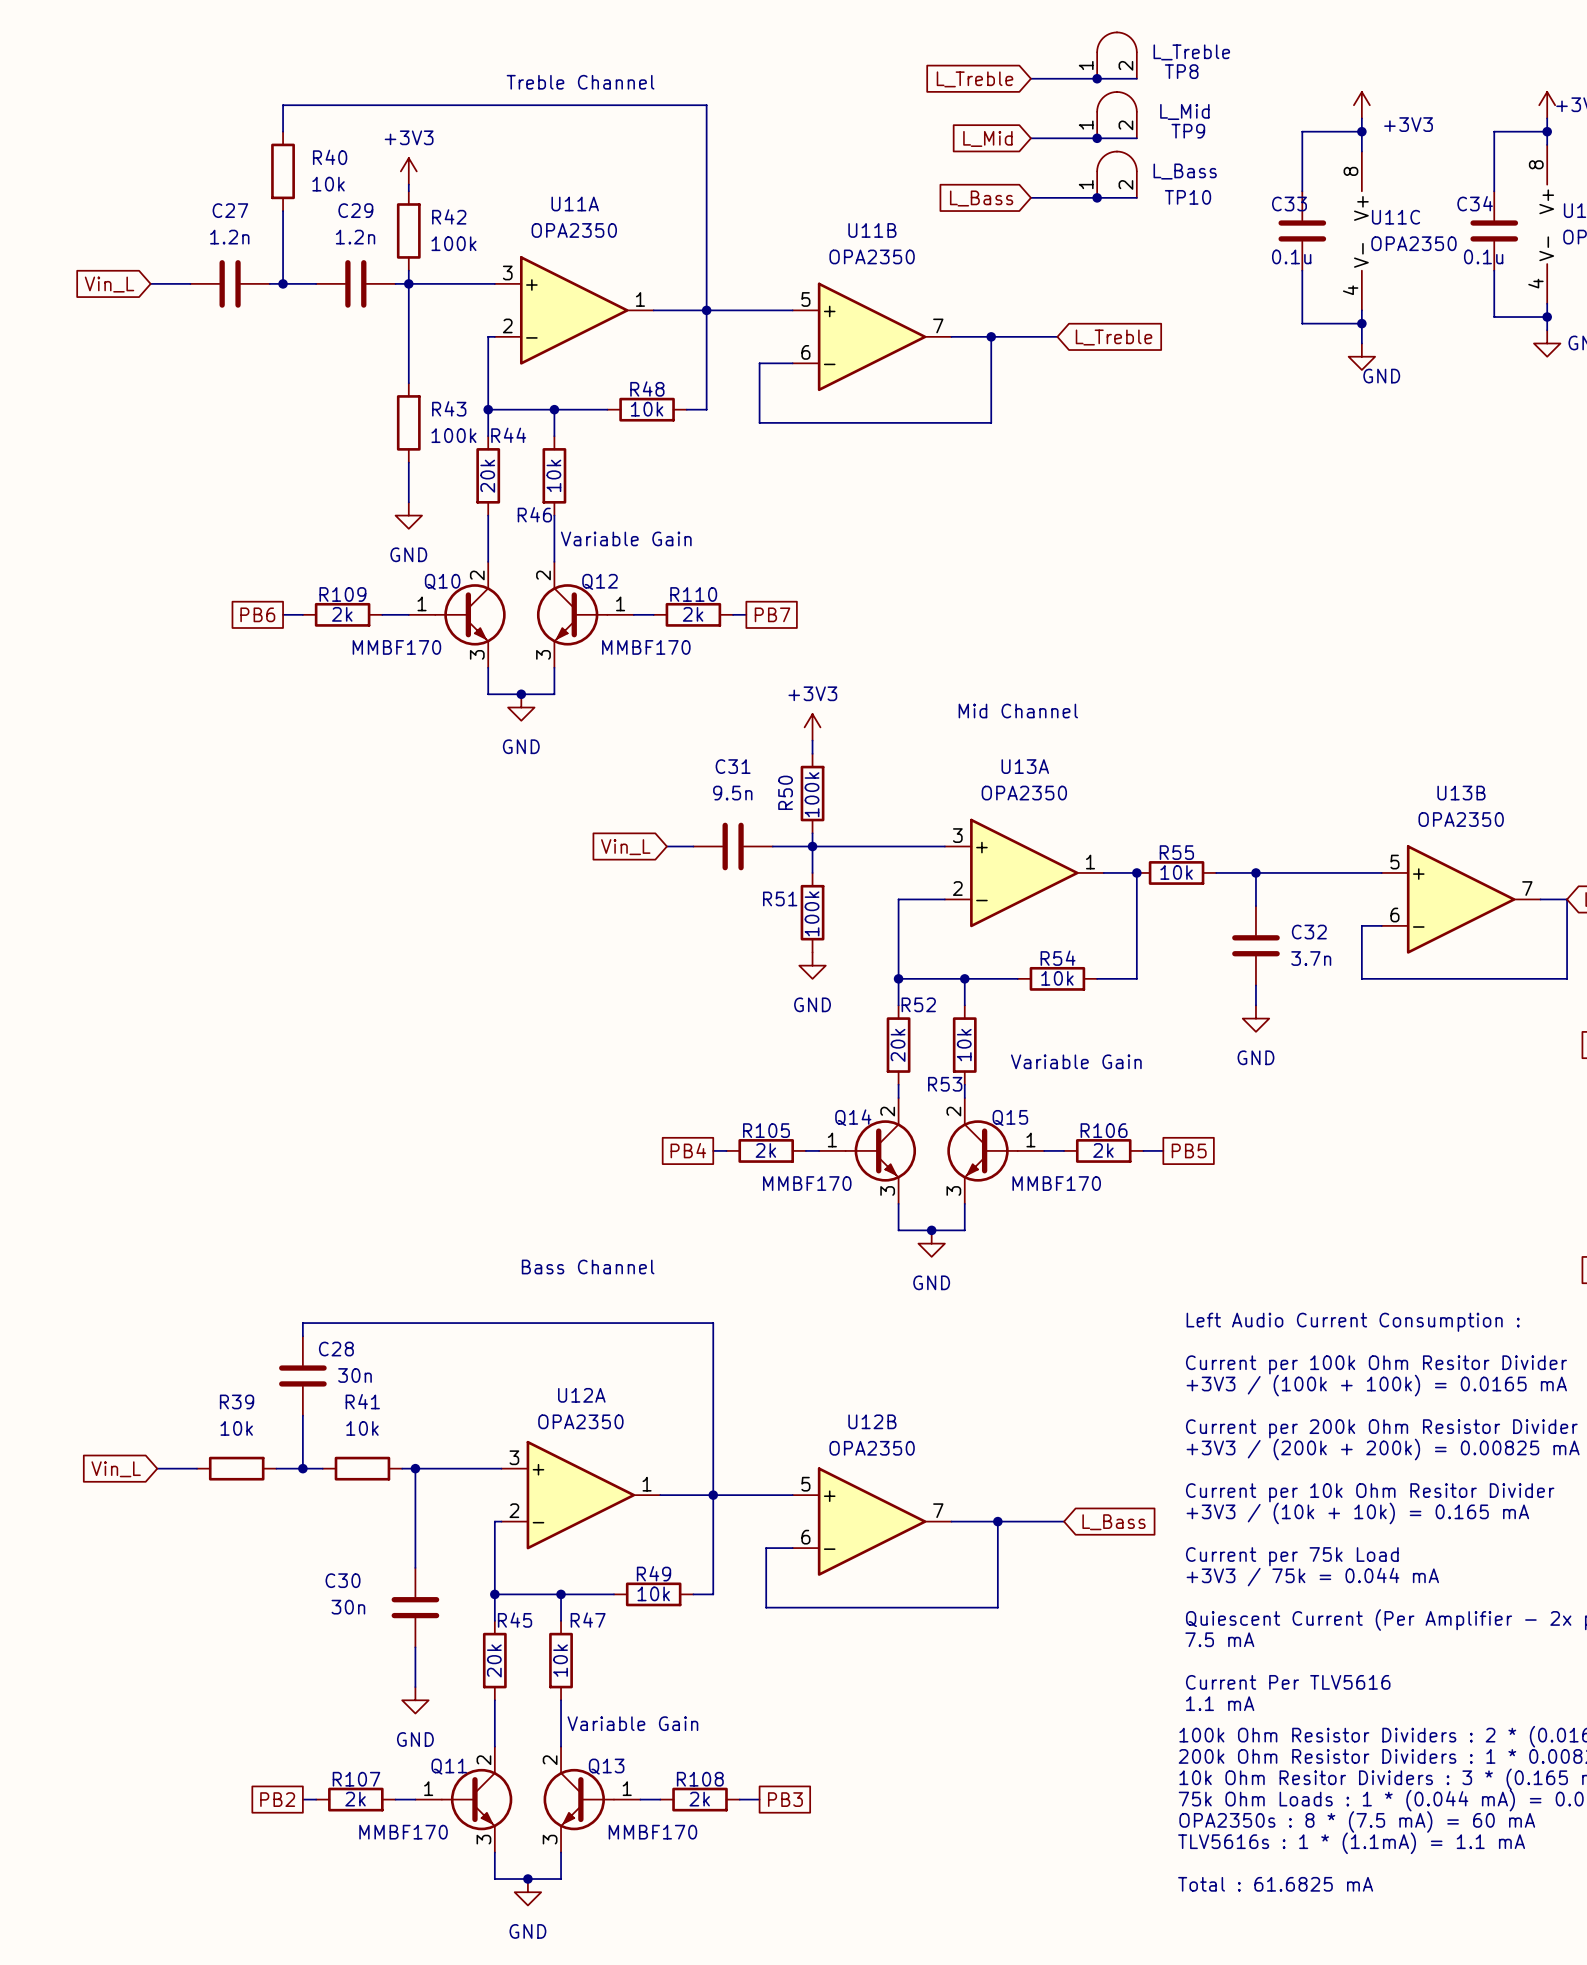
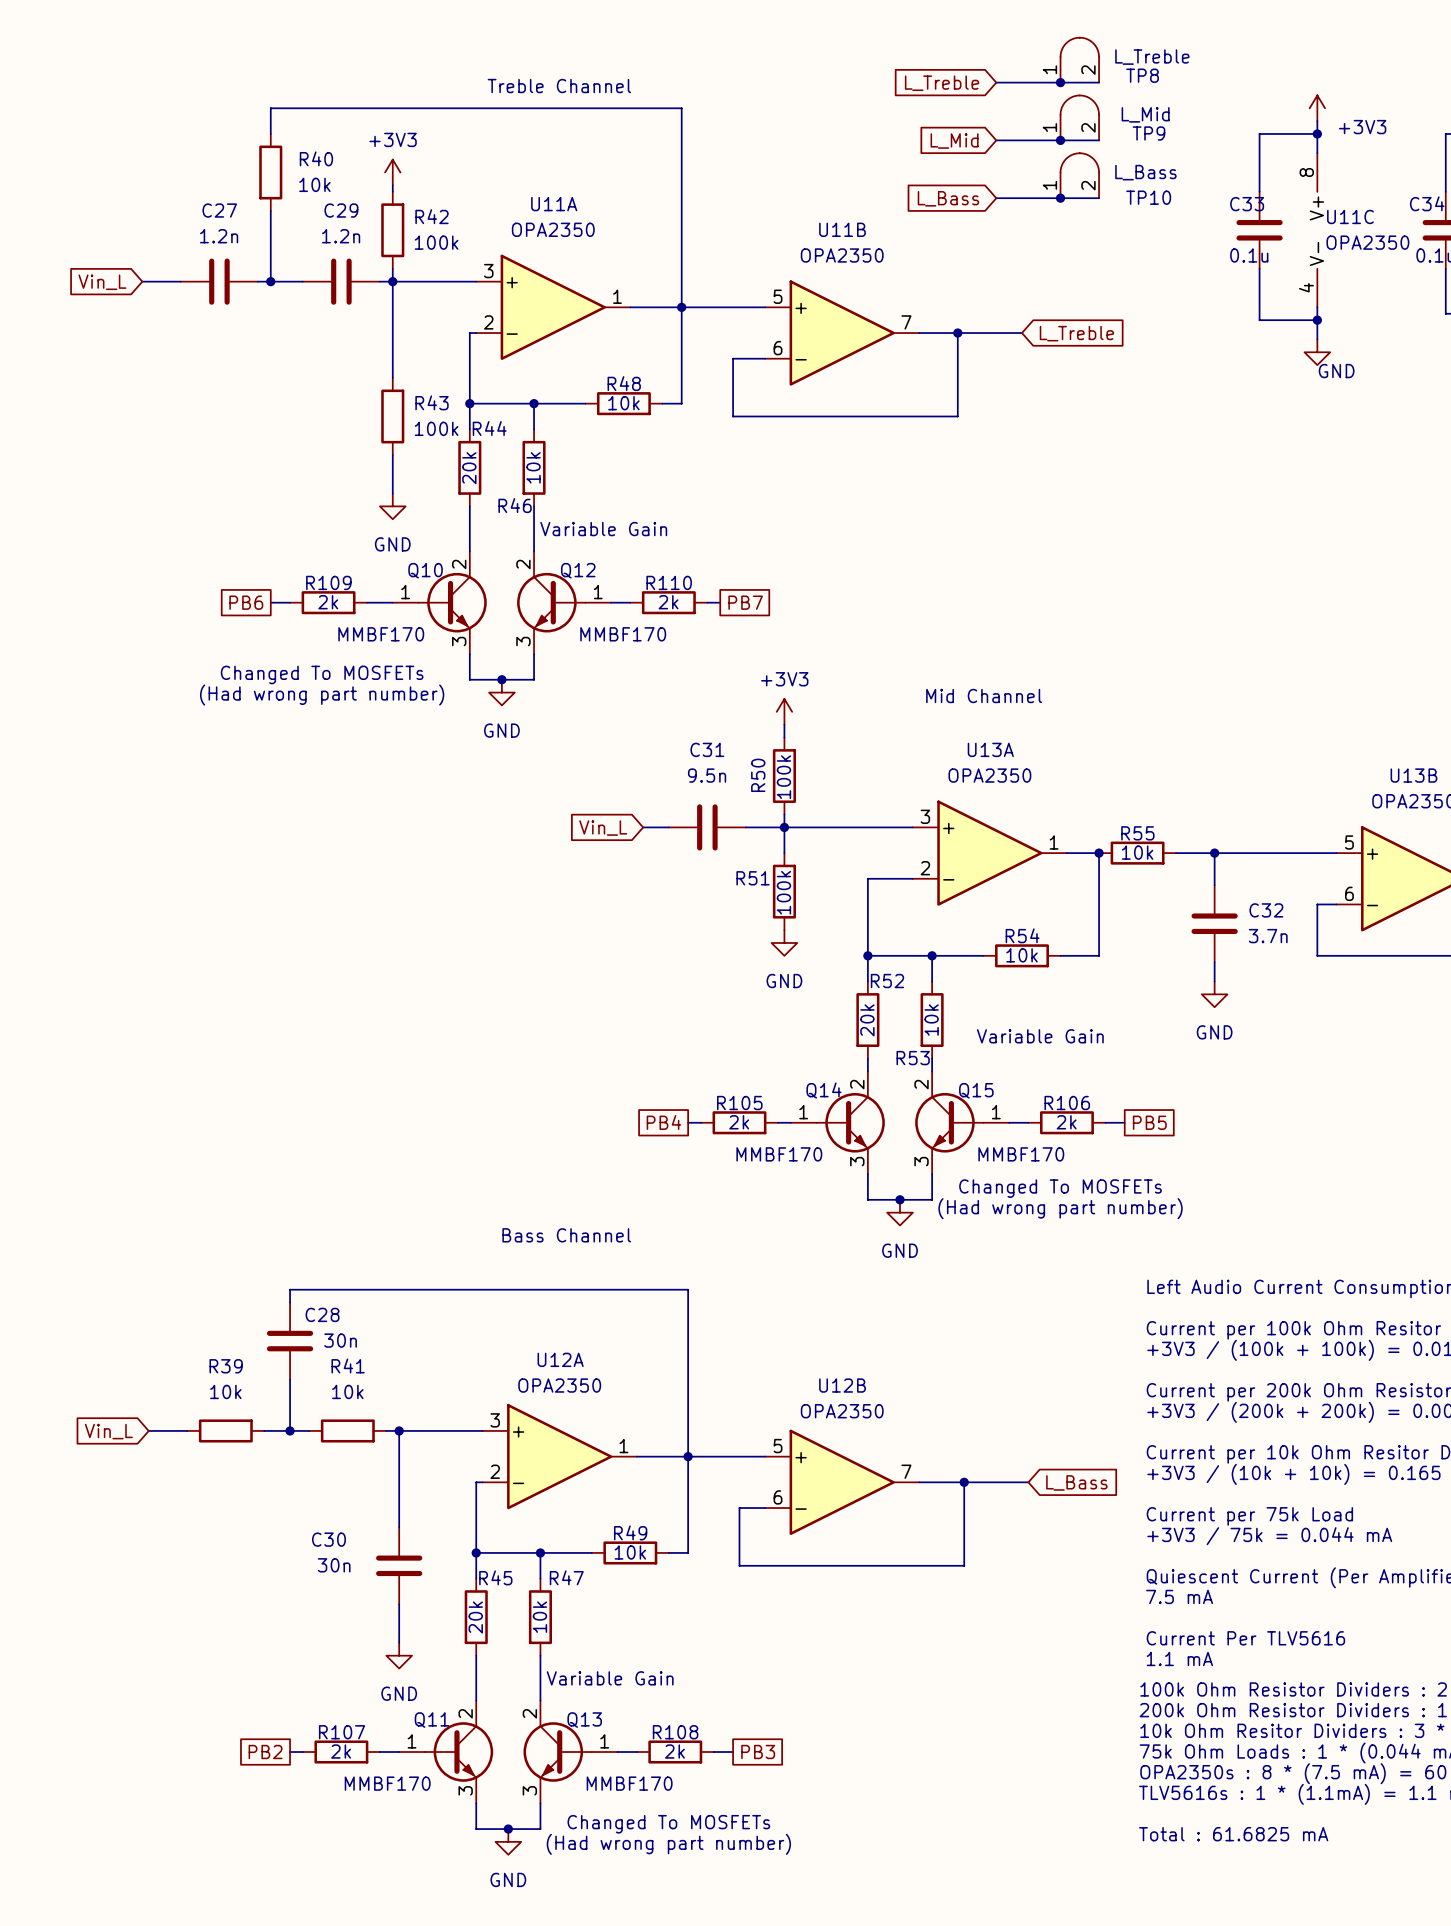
text: none -> Changed To MOSFETs (322, 674)
text: none -> (Had wrong part number) (322, 695)
text: none -> Changed To MOSFETs (1060, 1188)
text: none -> (Had wrong part number) (1060, 1208)
text: none -> Changed To MOSFETs (668, 1824)
text: none -> (Had wrong part number) (668, 1844)

